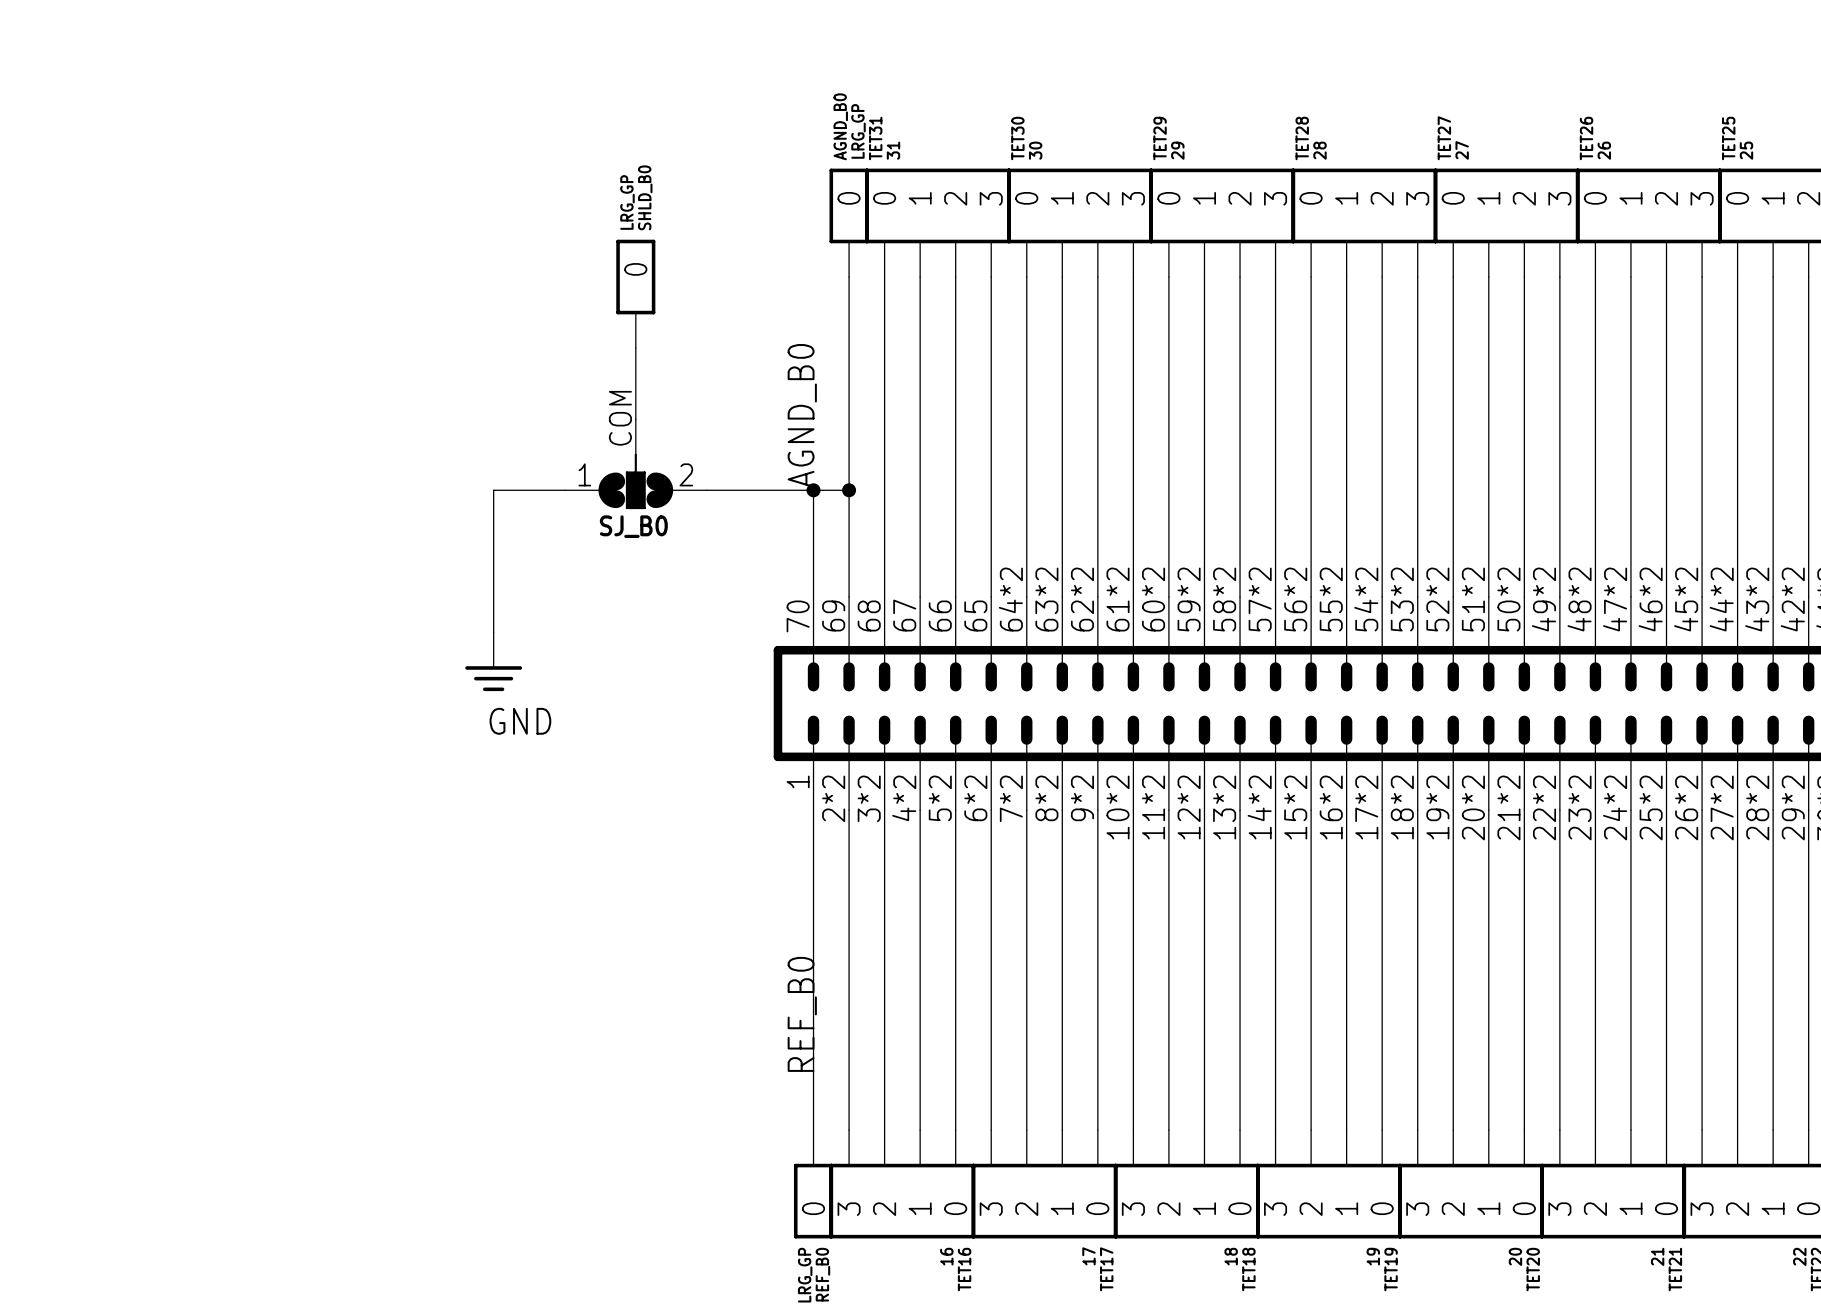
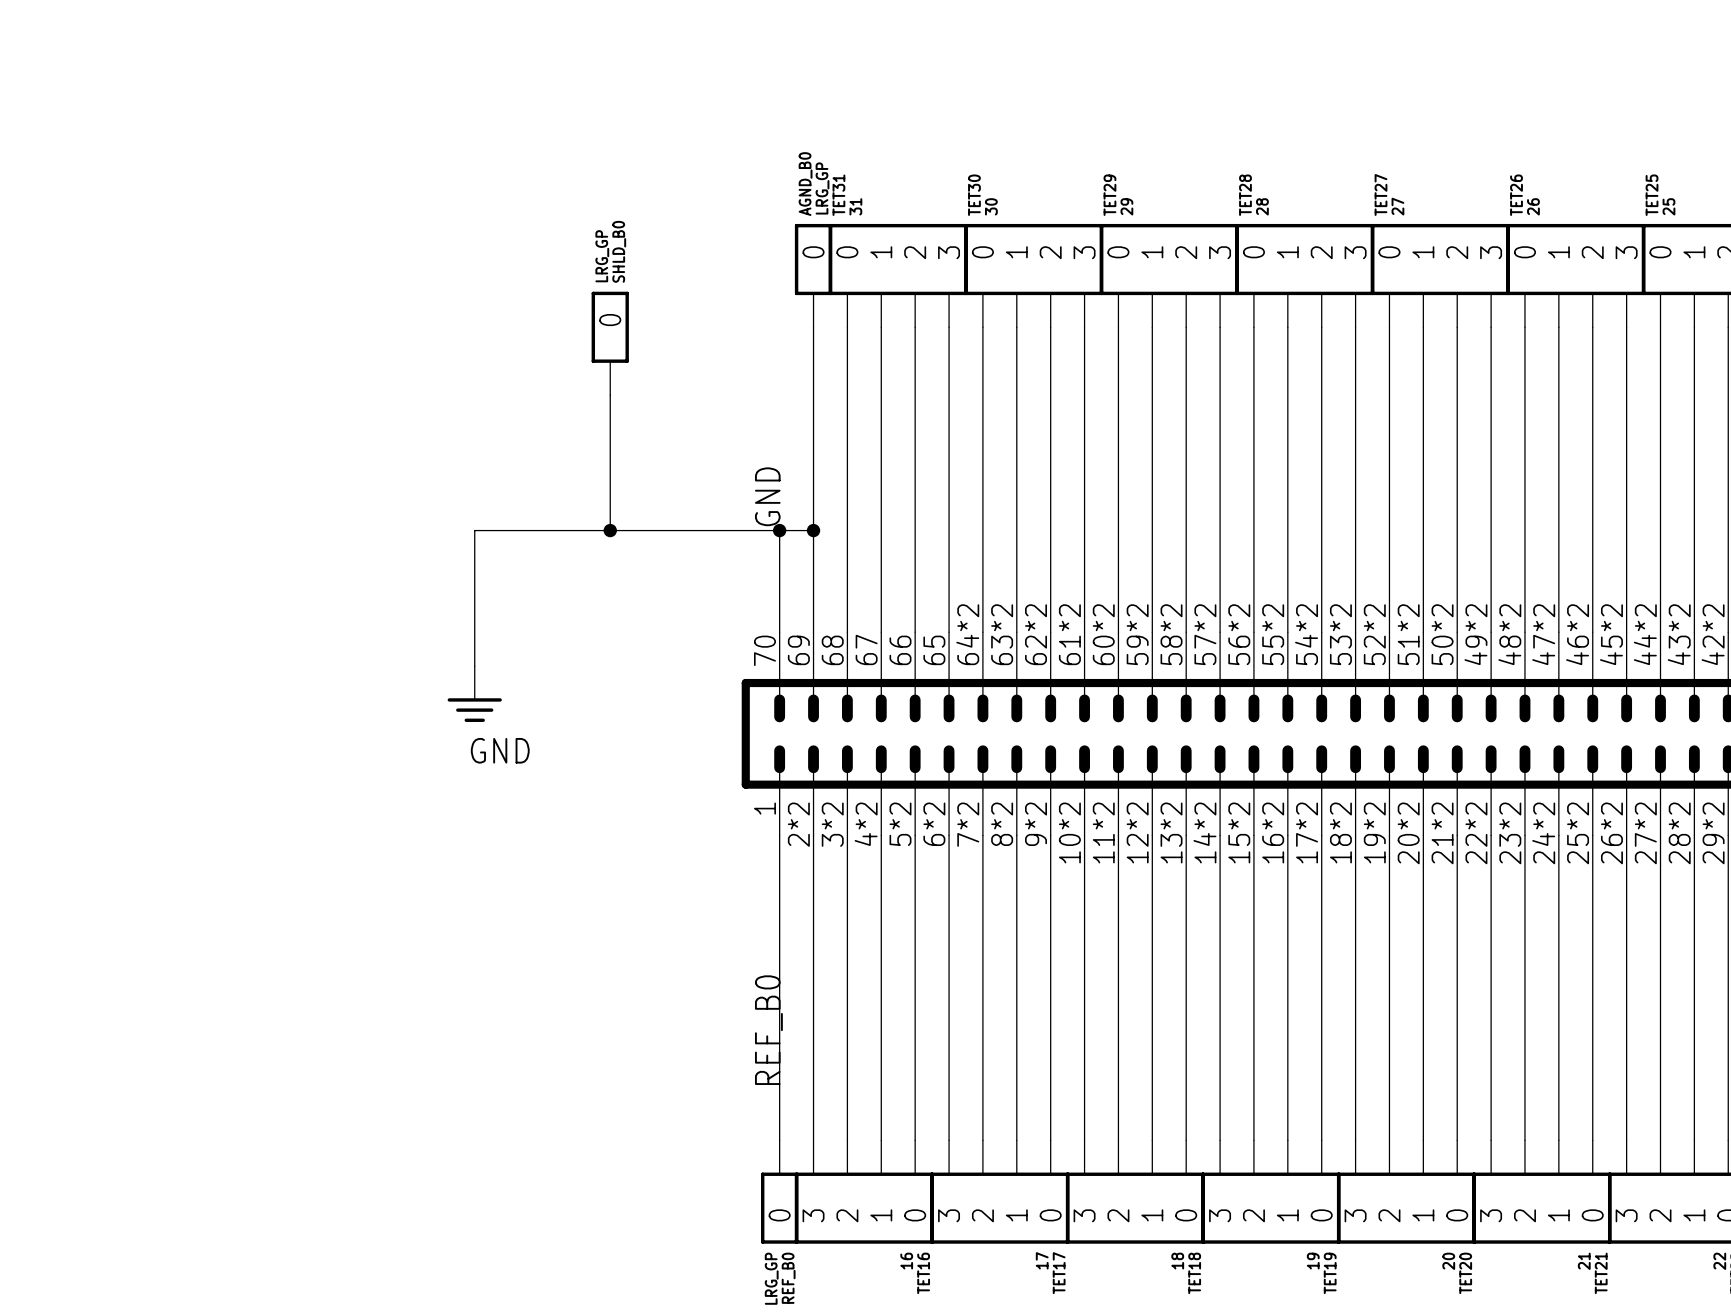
label: AGND_B0 (802, 415) -> GND (767, 496)
SJ_B0: (635, 464) -> none
junction: none -> (610, 530)

